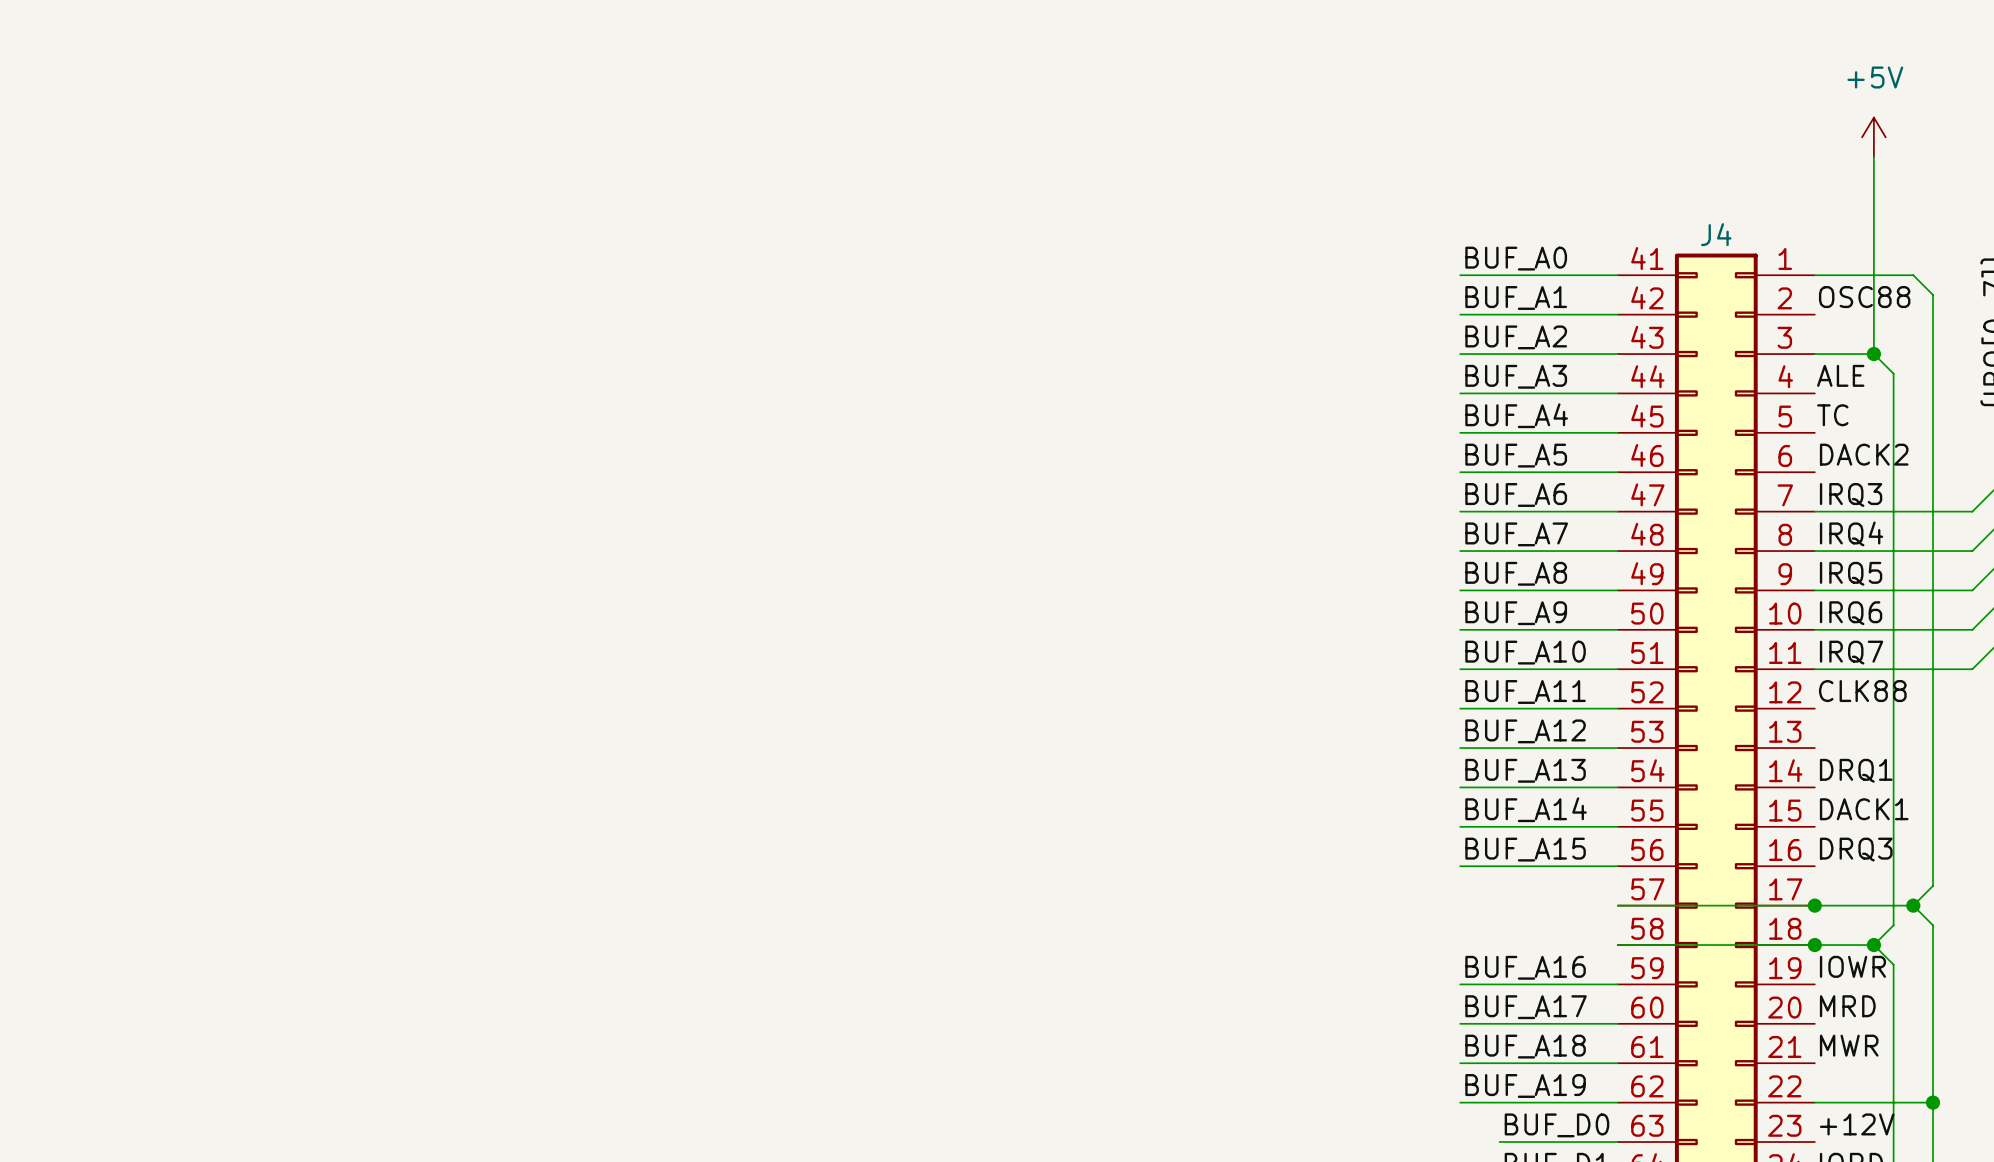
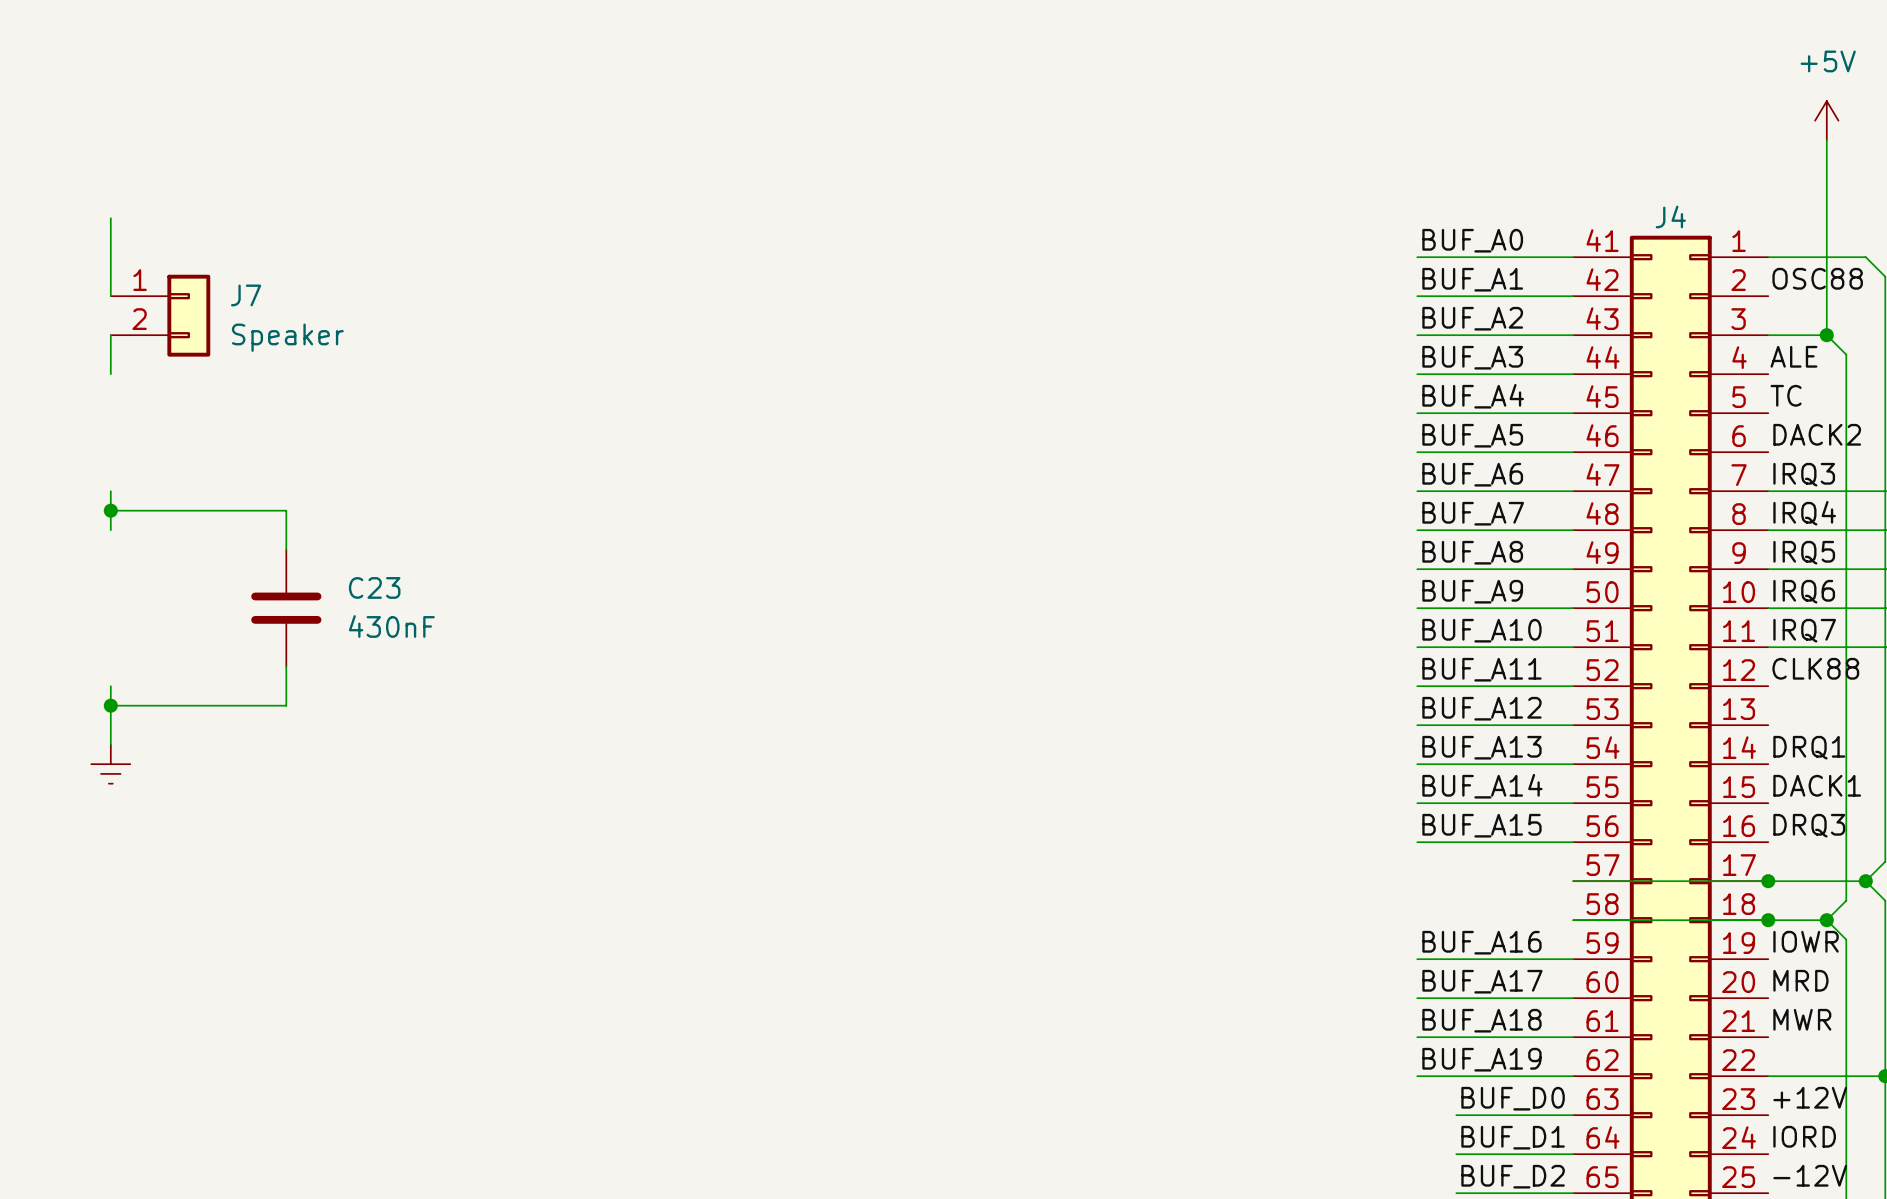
wire: none -> (110, 218) (110, 296)
J7: none -> Speaker (160, 315)
wire: none -> (110, 335) (110, 374)
wire: none -> (110, 491) (110, 530)
wire: none -> (110, 510) (286, 510) (286, 549)
junction: none -> (110, 510)
C23: none -> 430nF (286, 608)
wire: none -> (286, 666) (286, 705) (110, 705)
wire: none -> (110, 686) (110, 744)
junction: none -> (110, 705)
power symbol: none -> (110, 764)

